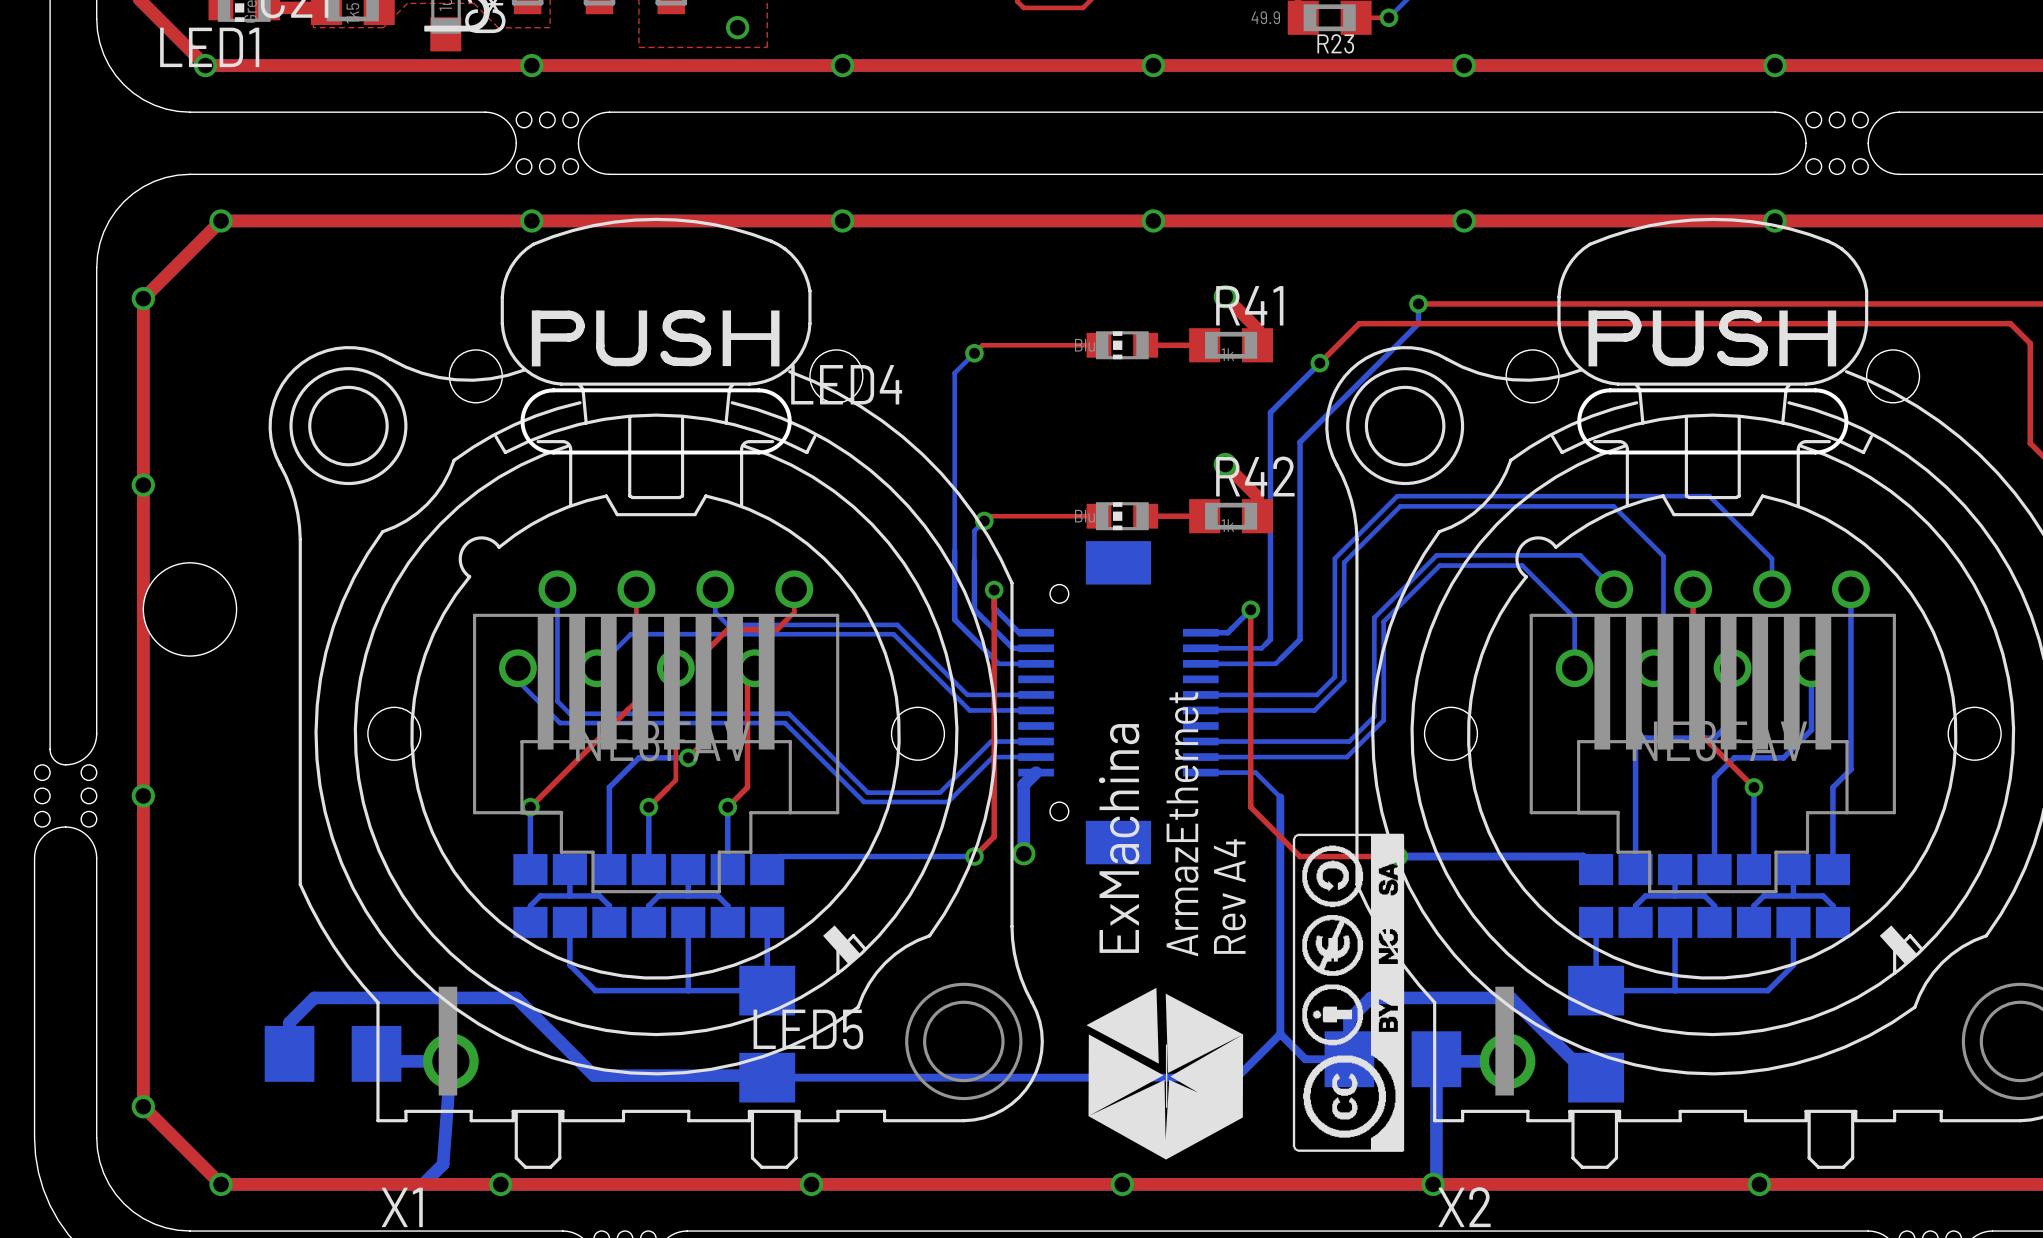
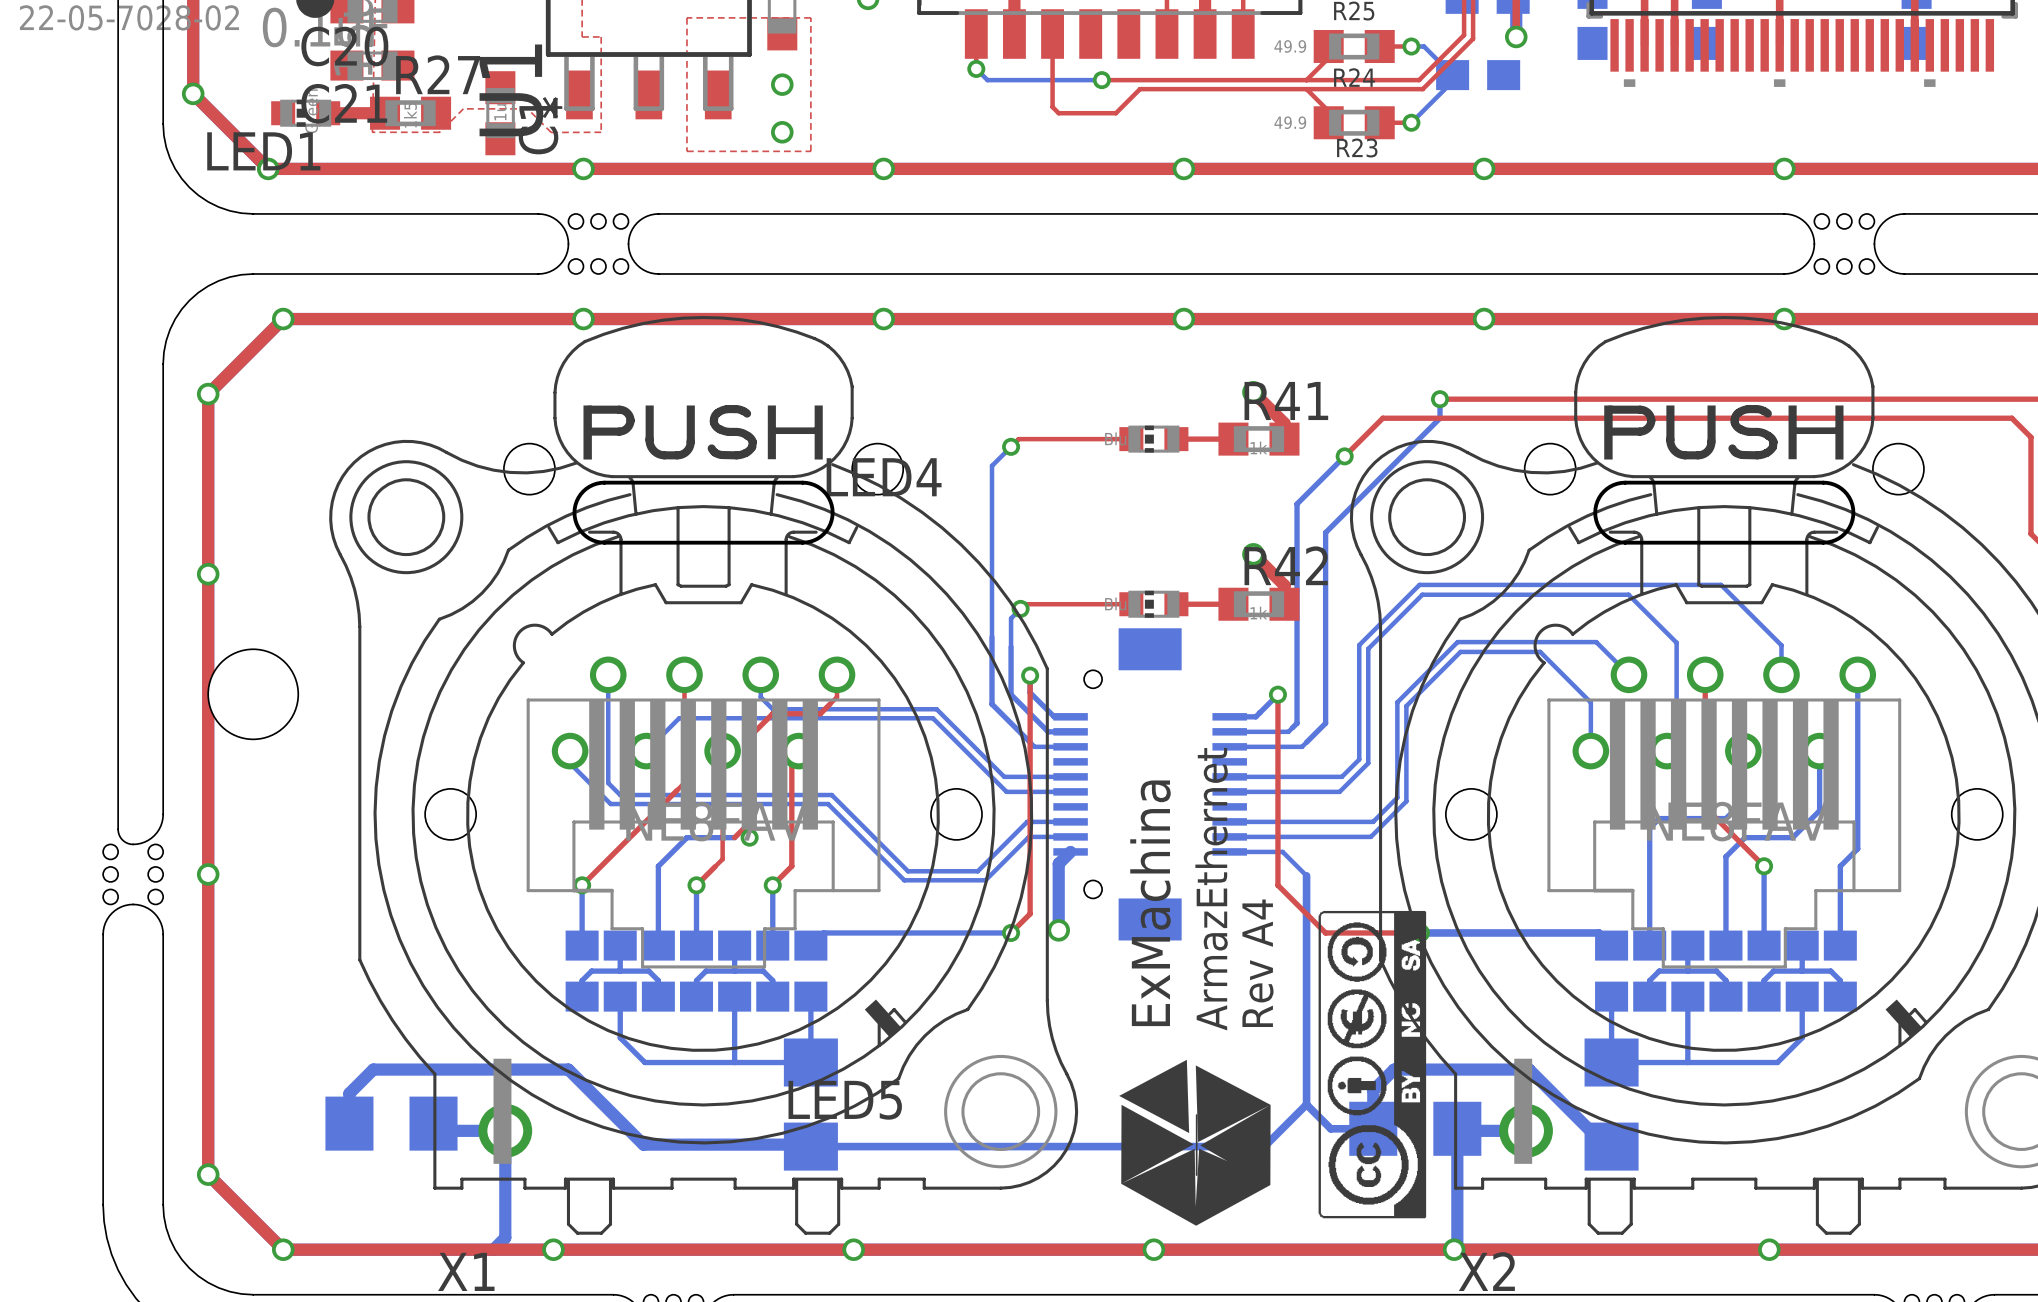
via position: (688, 757) -> (749, 837)
bottom track: (450, 1061) (443, 1164) (423, 1184) -> (505, 1130) (505, 1237) (493, 1249)

